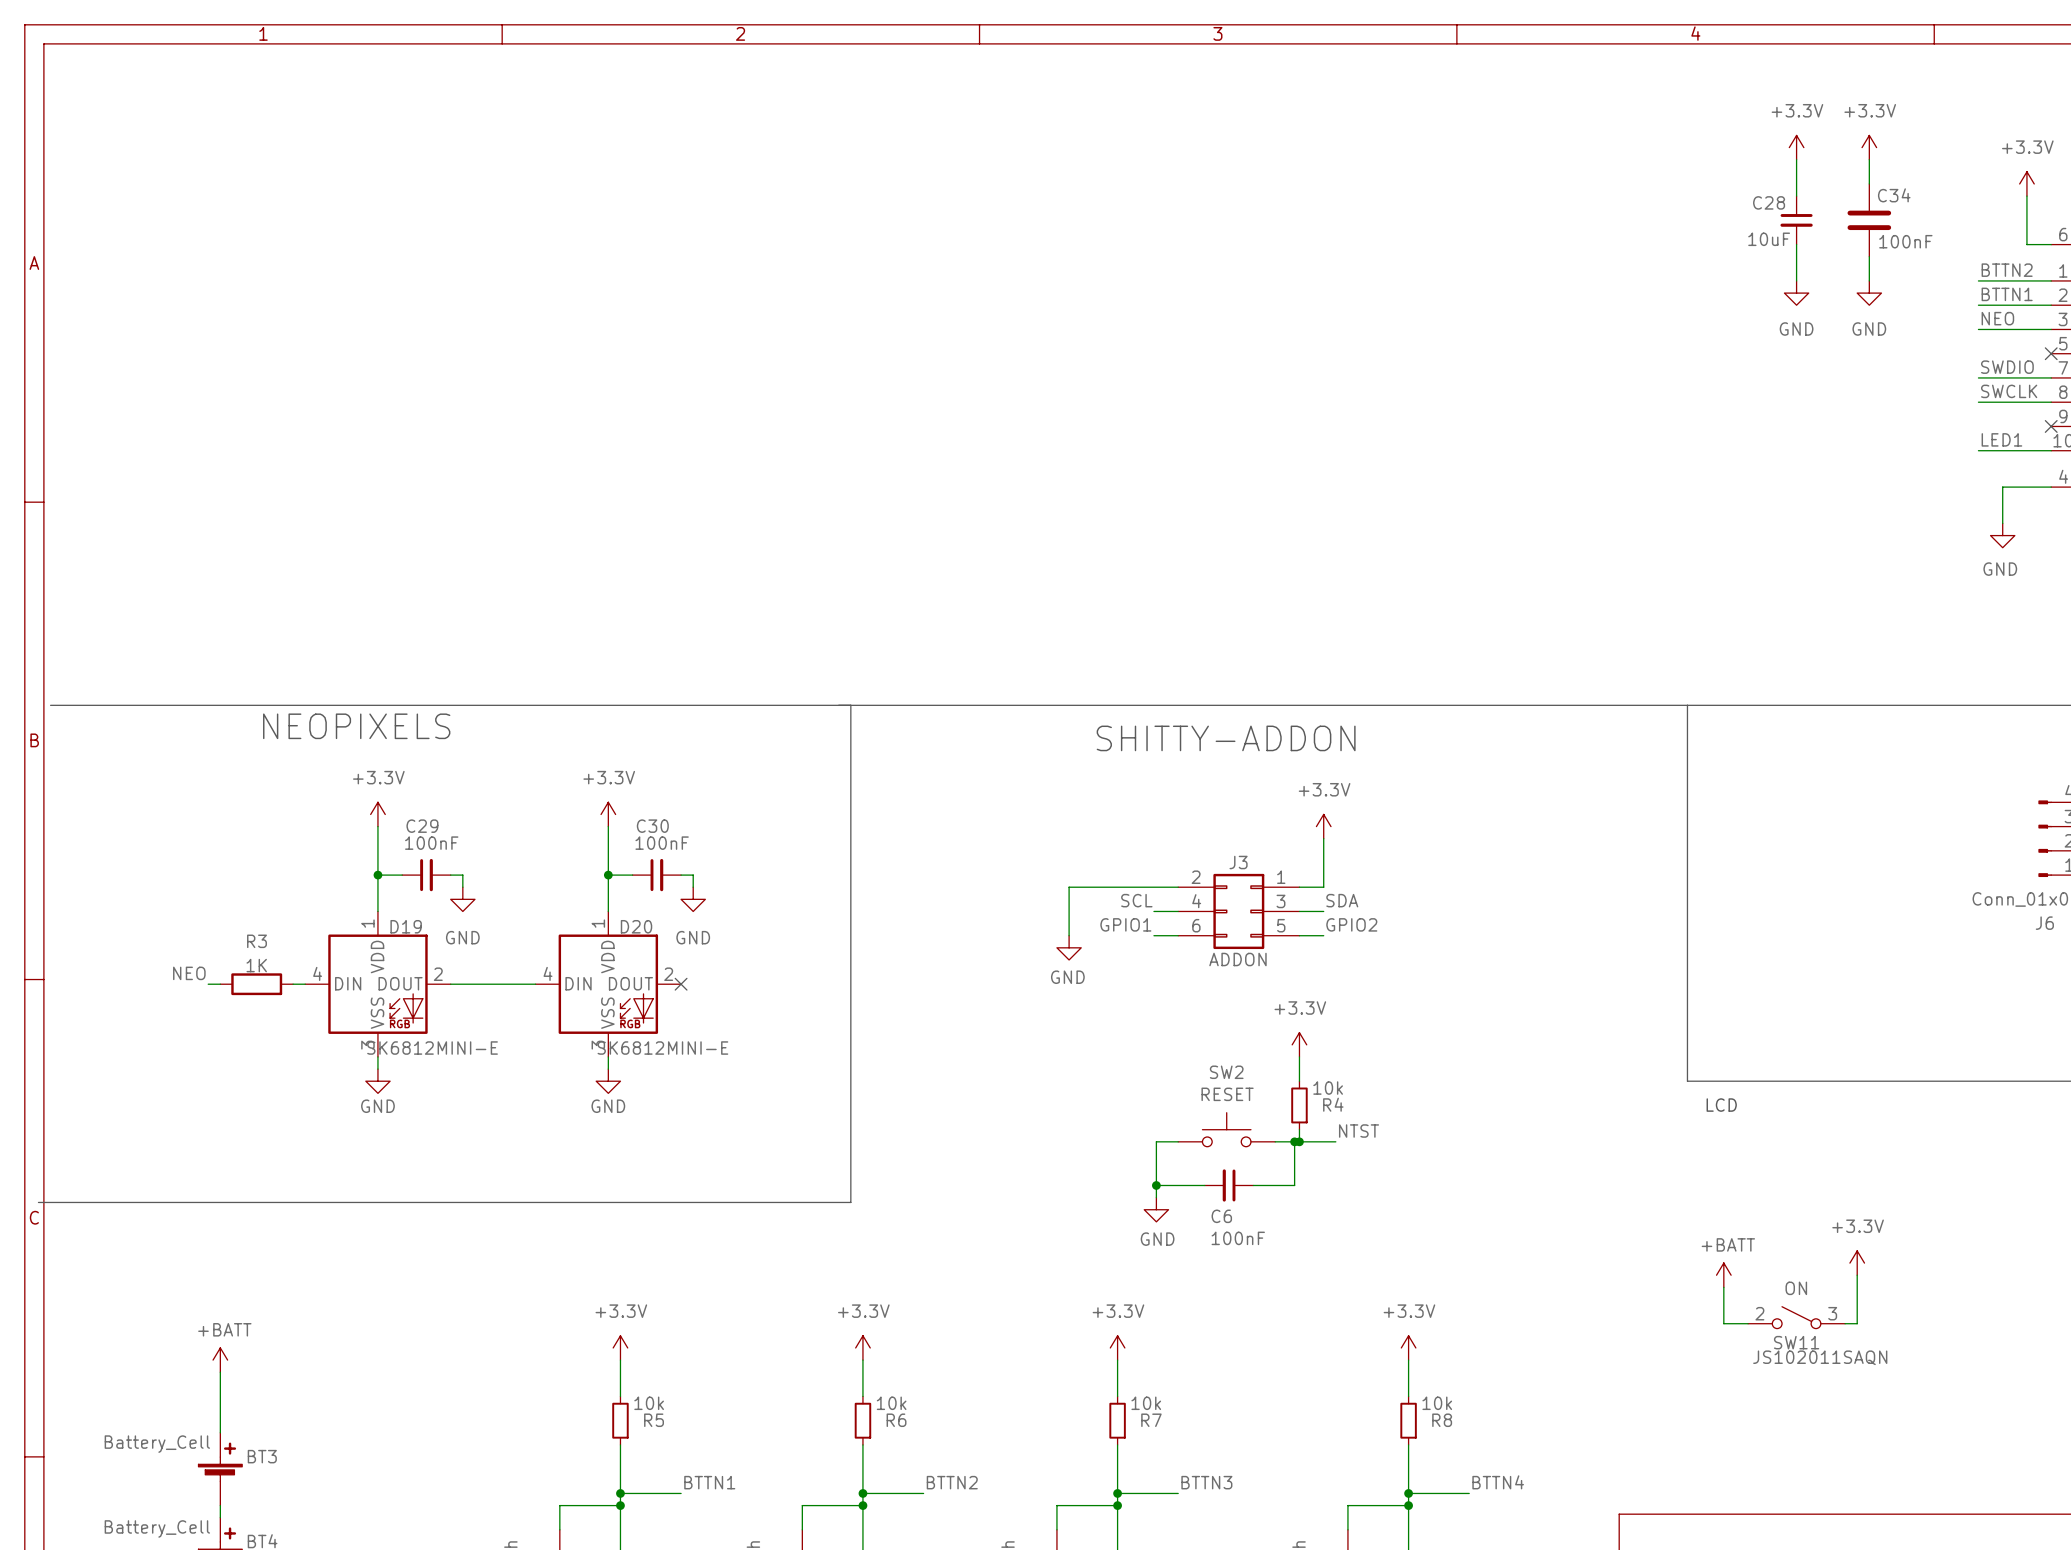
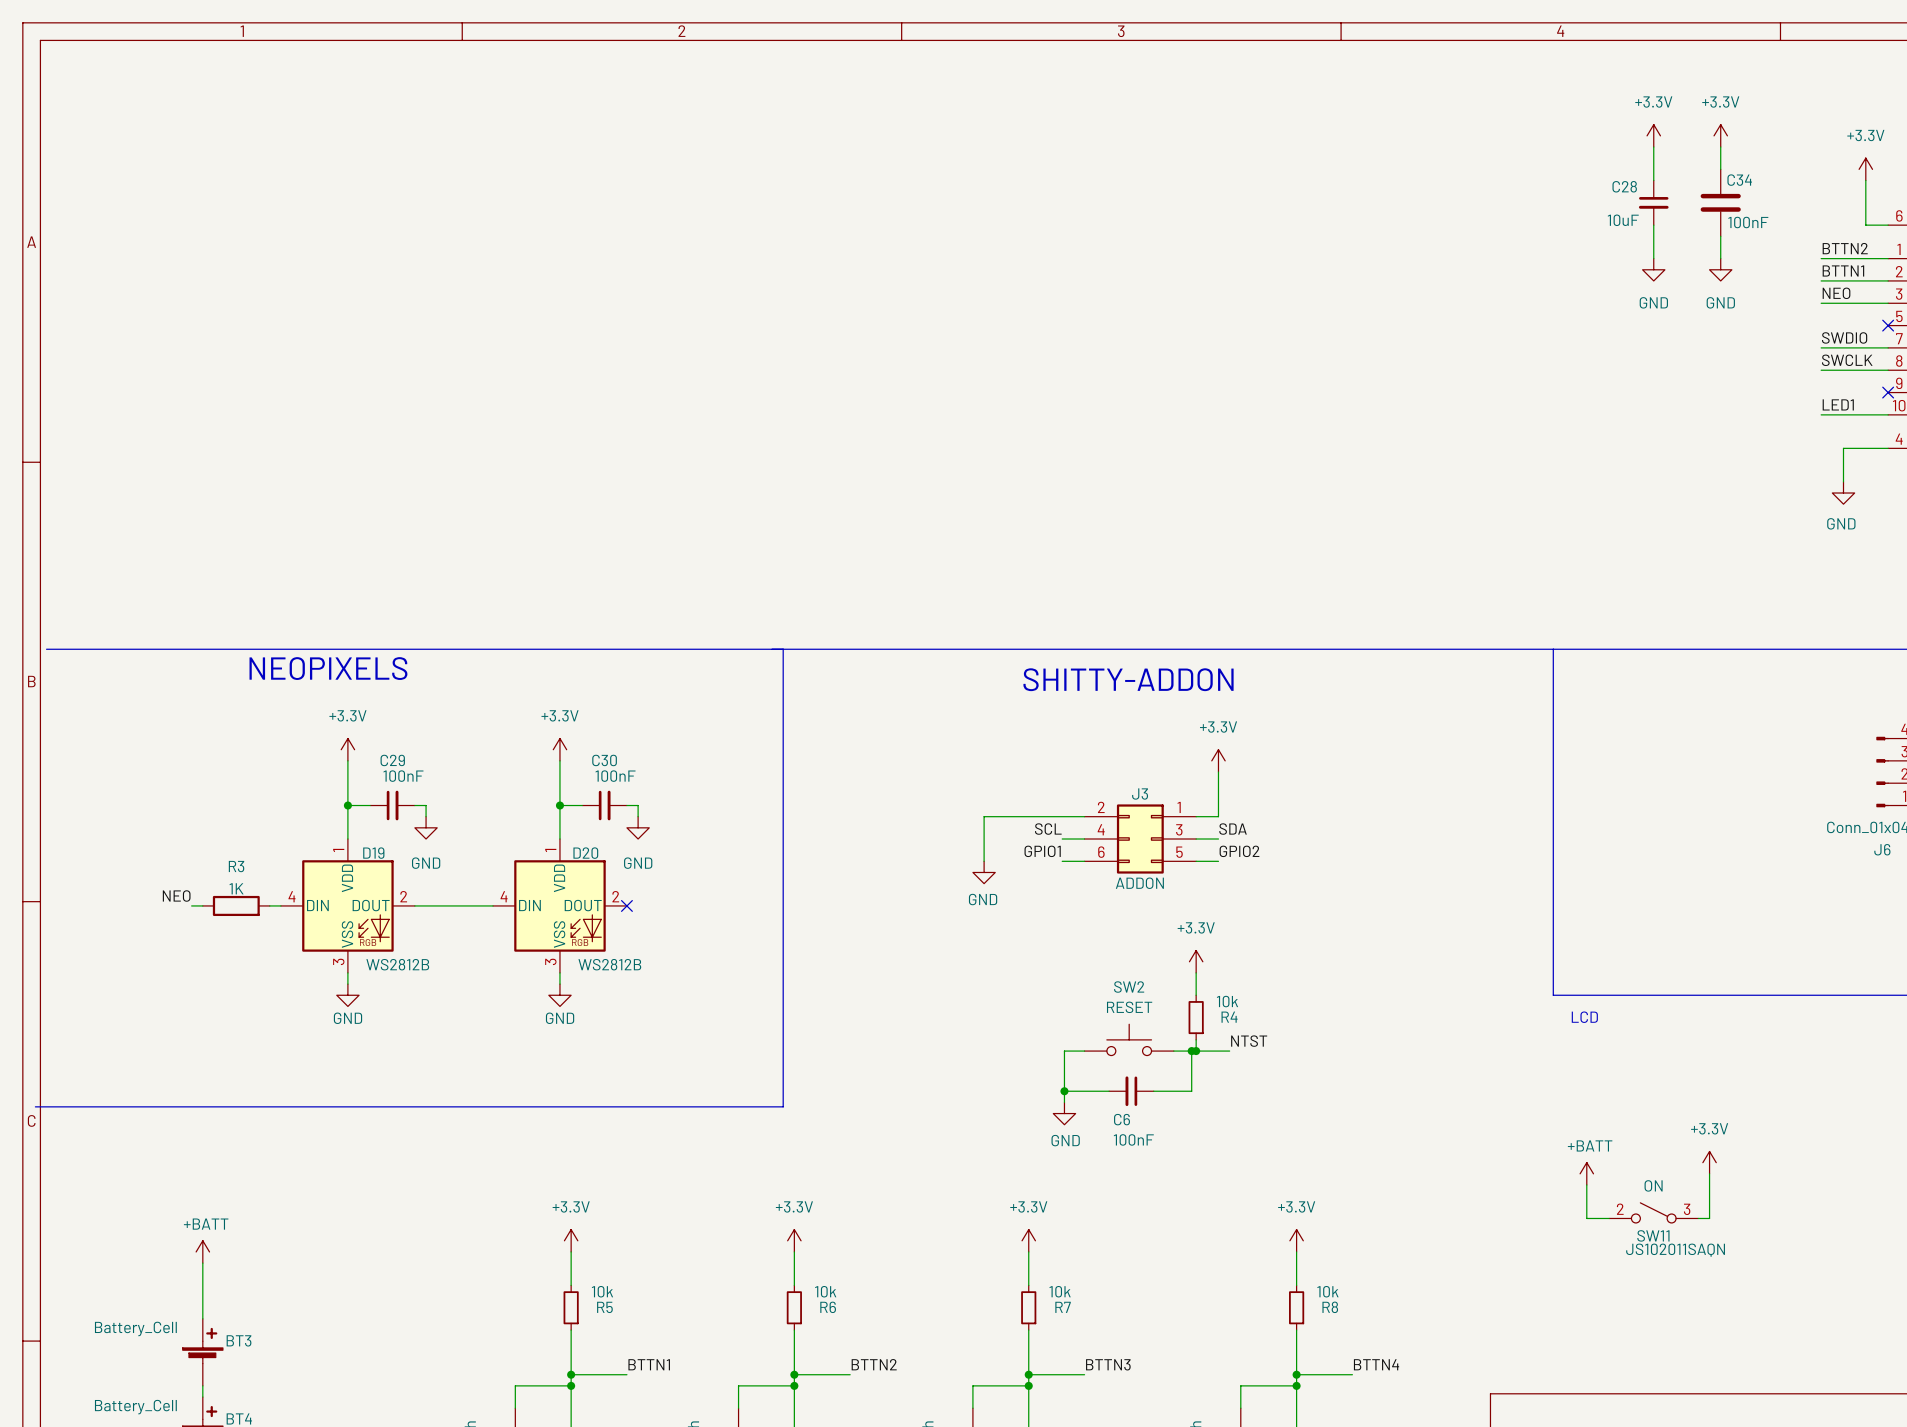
D19 value: SK6812MINI-E (432, 1048) -> WS2812B (397, 964)
D20 value: SK6812MINI-E (662, 1048) -> WS2812B (609, 964)

